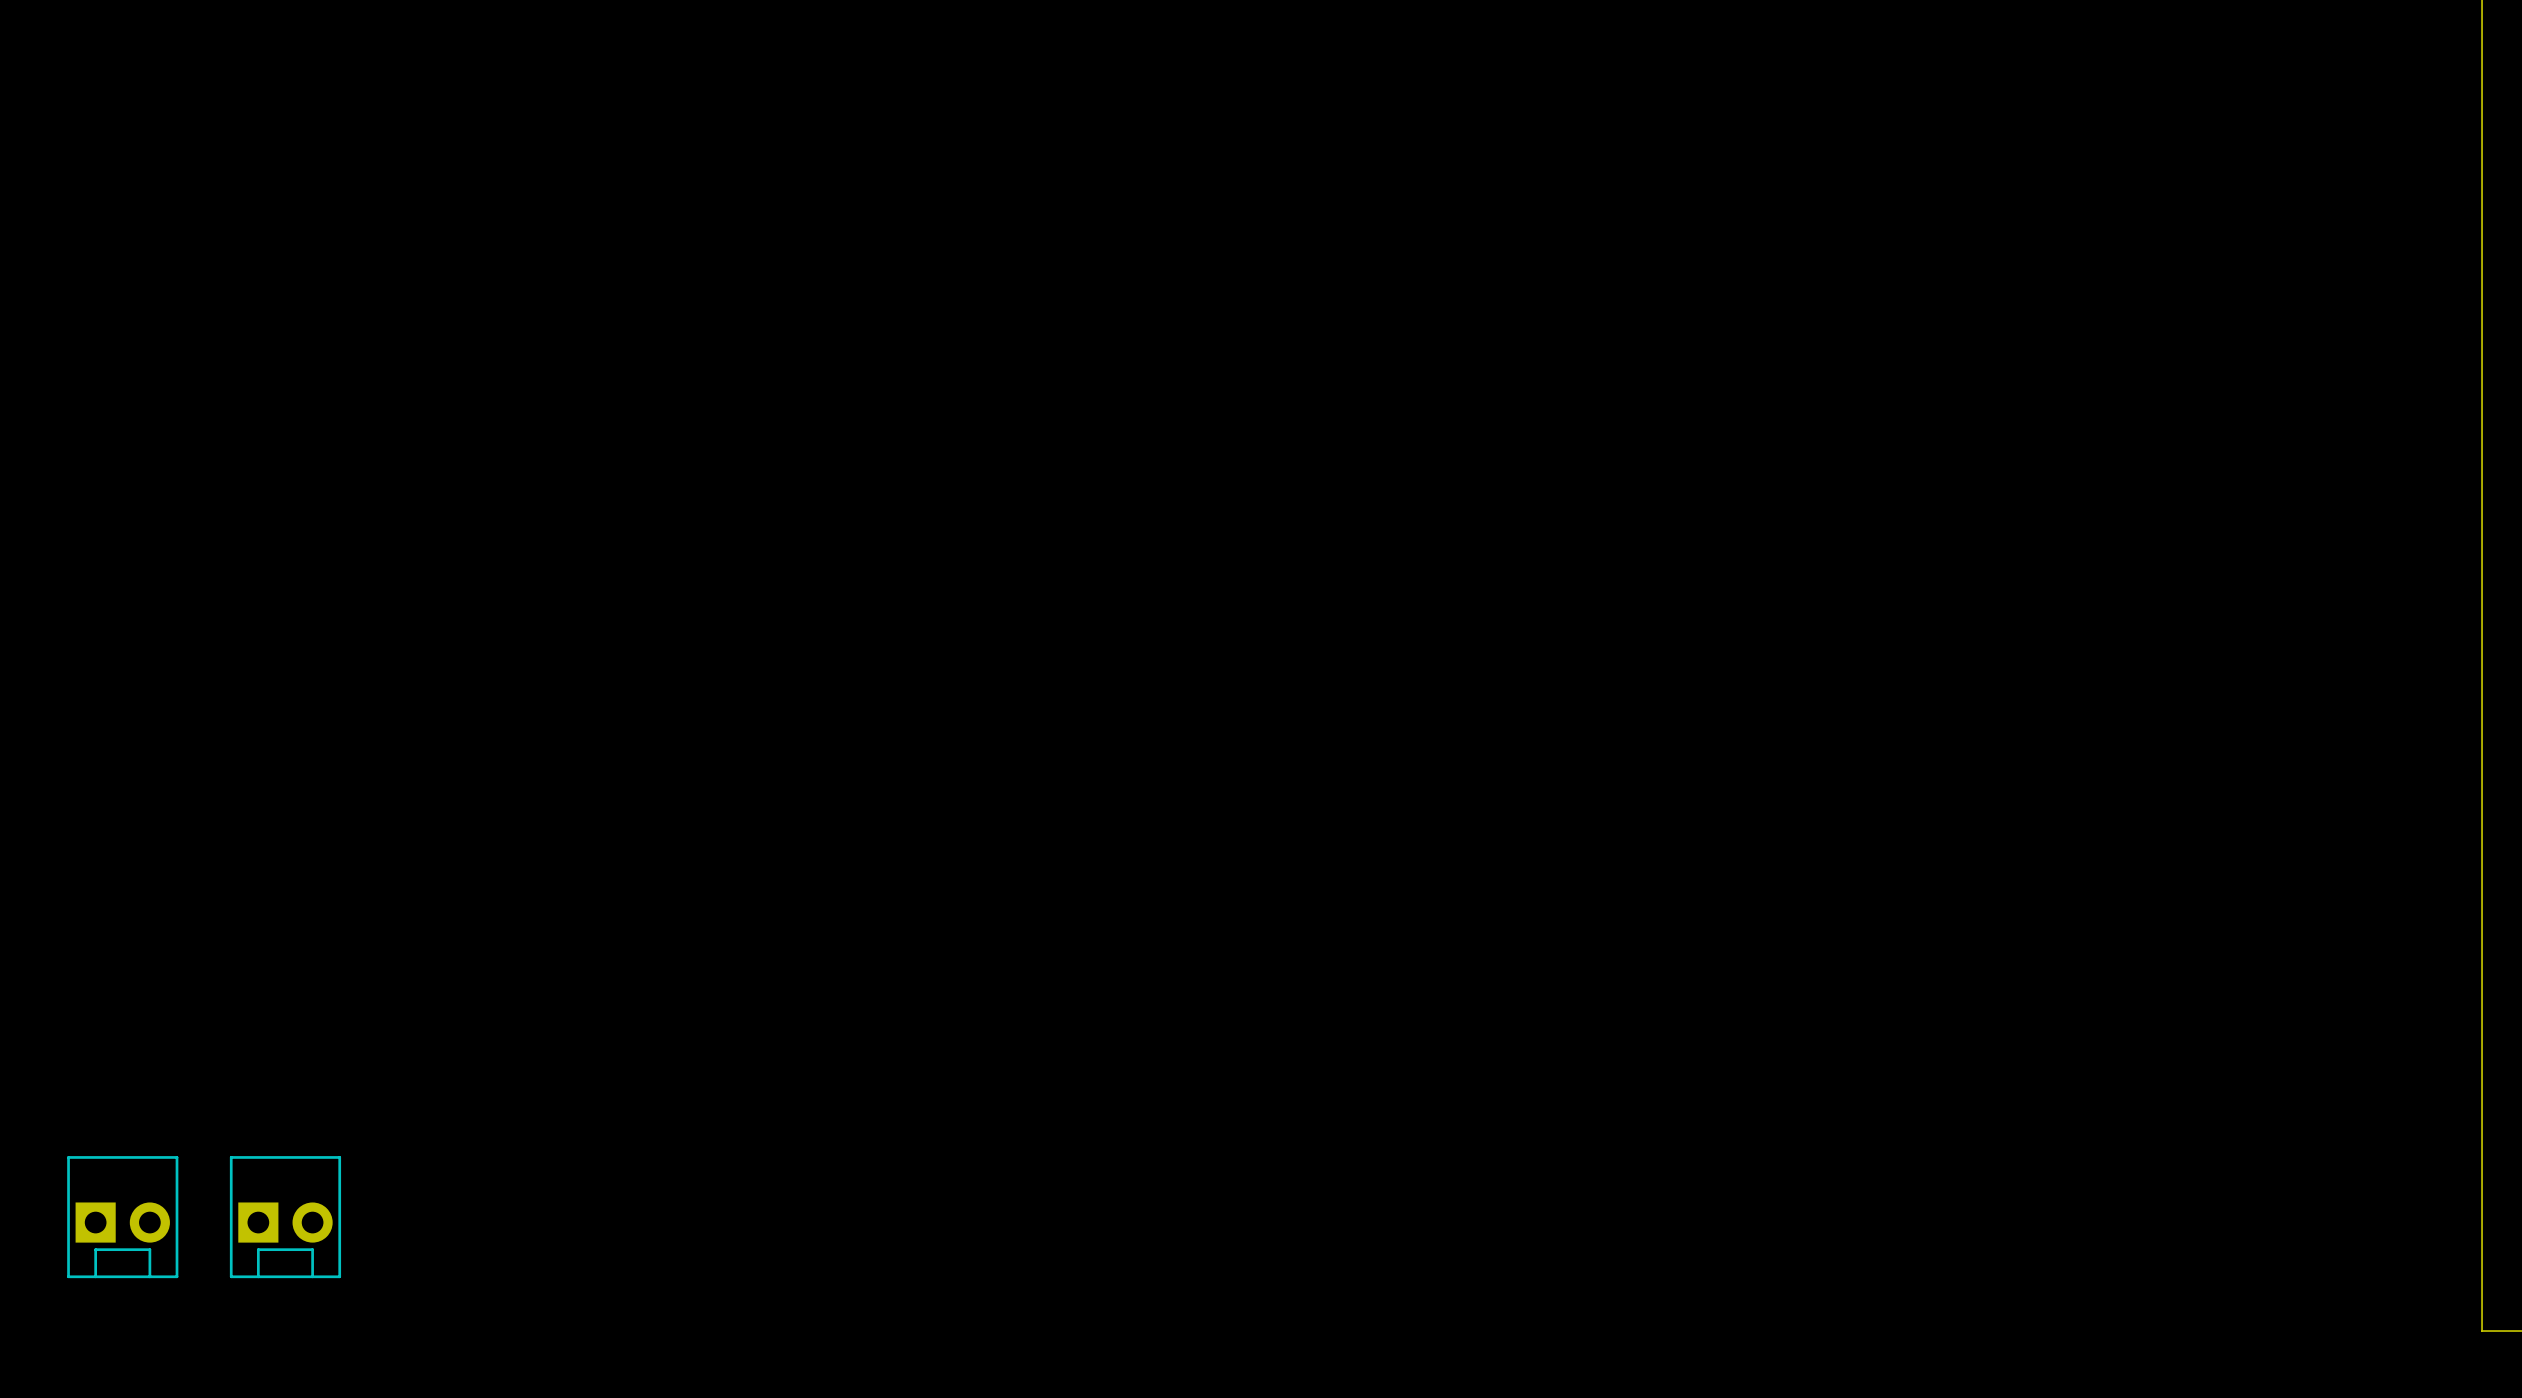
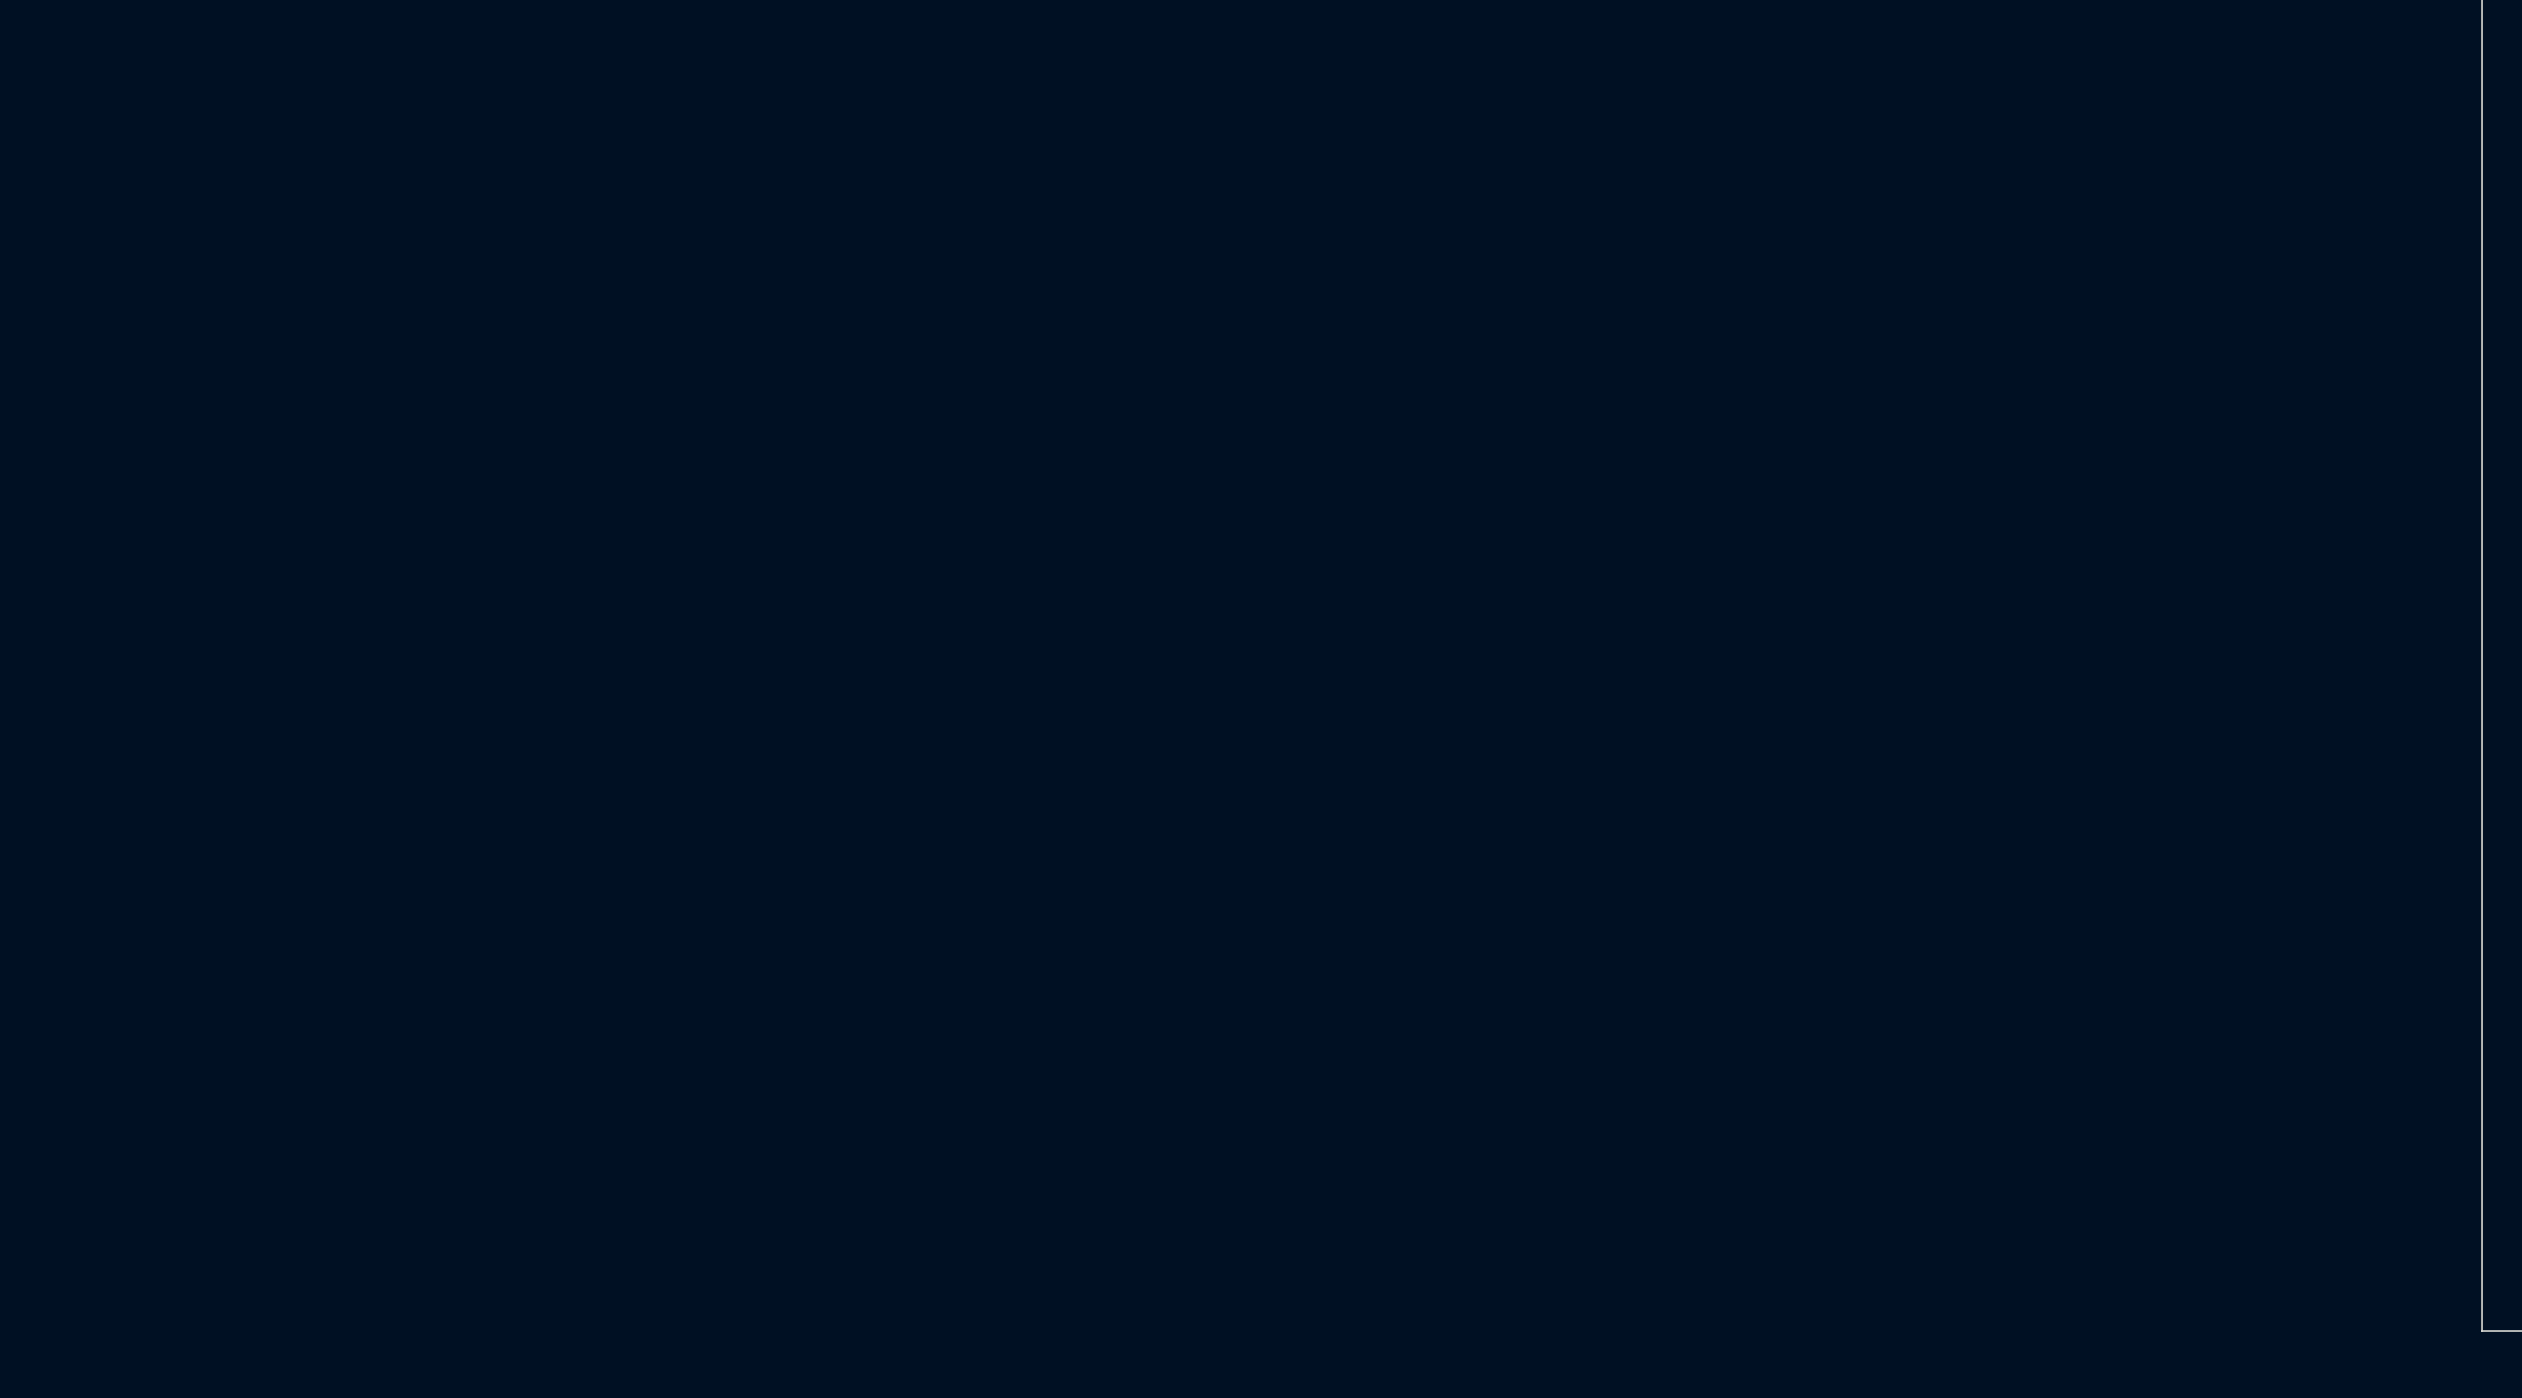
part: (122, 1217) -> none
part: (285, 1217) -> none

